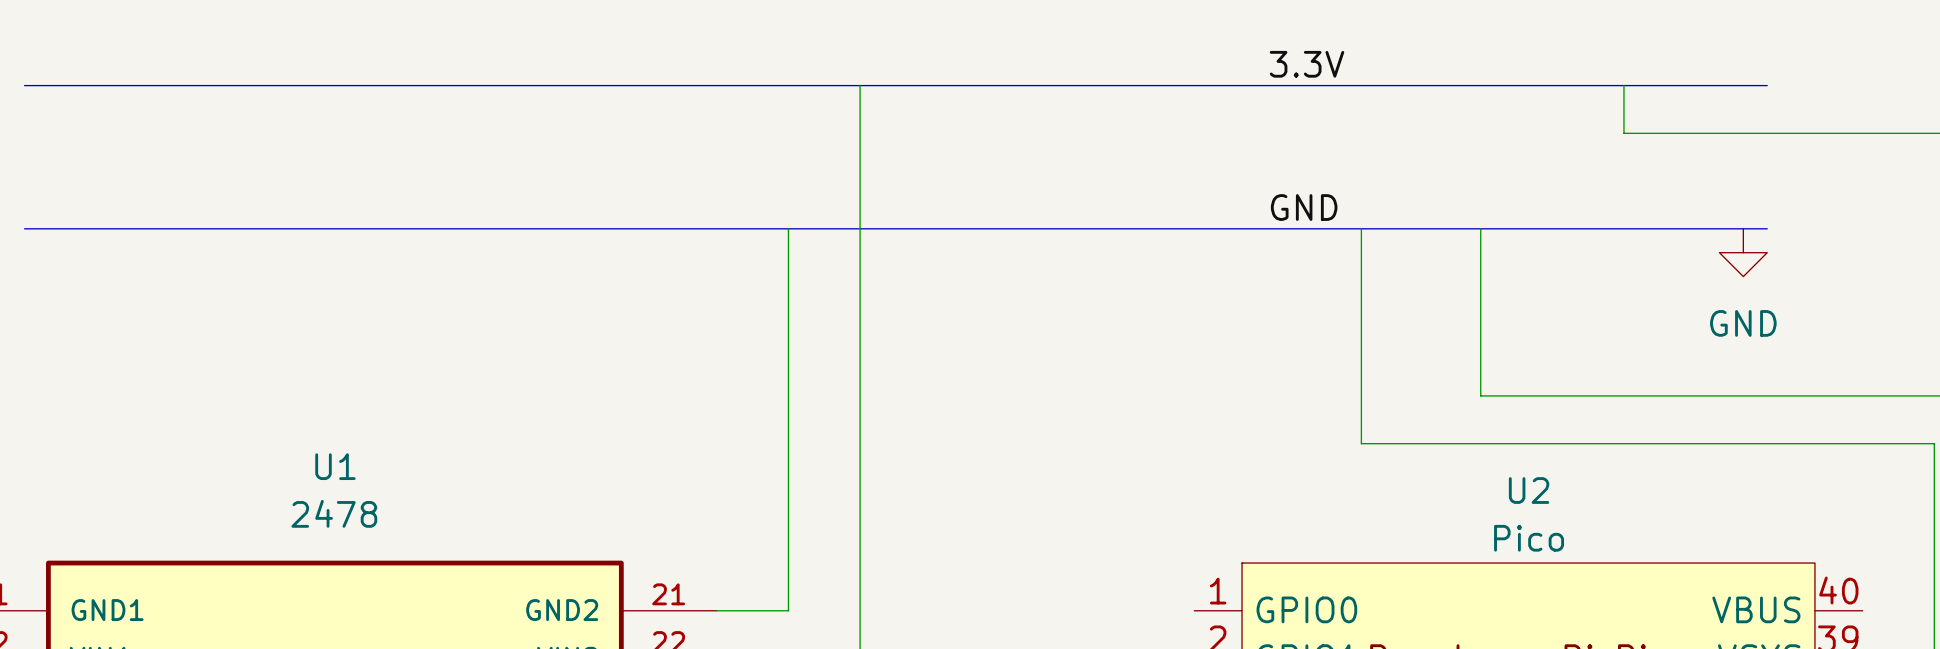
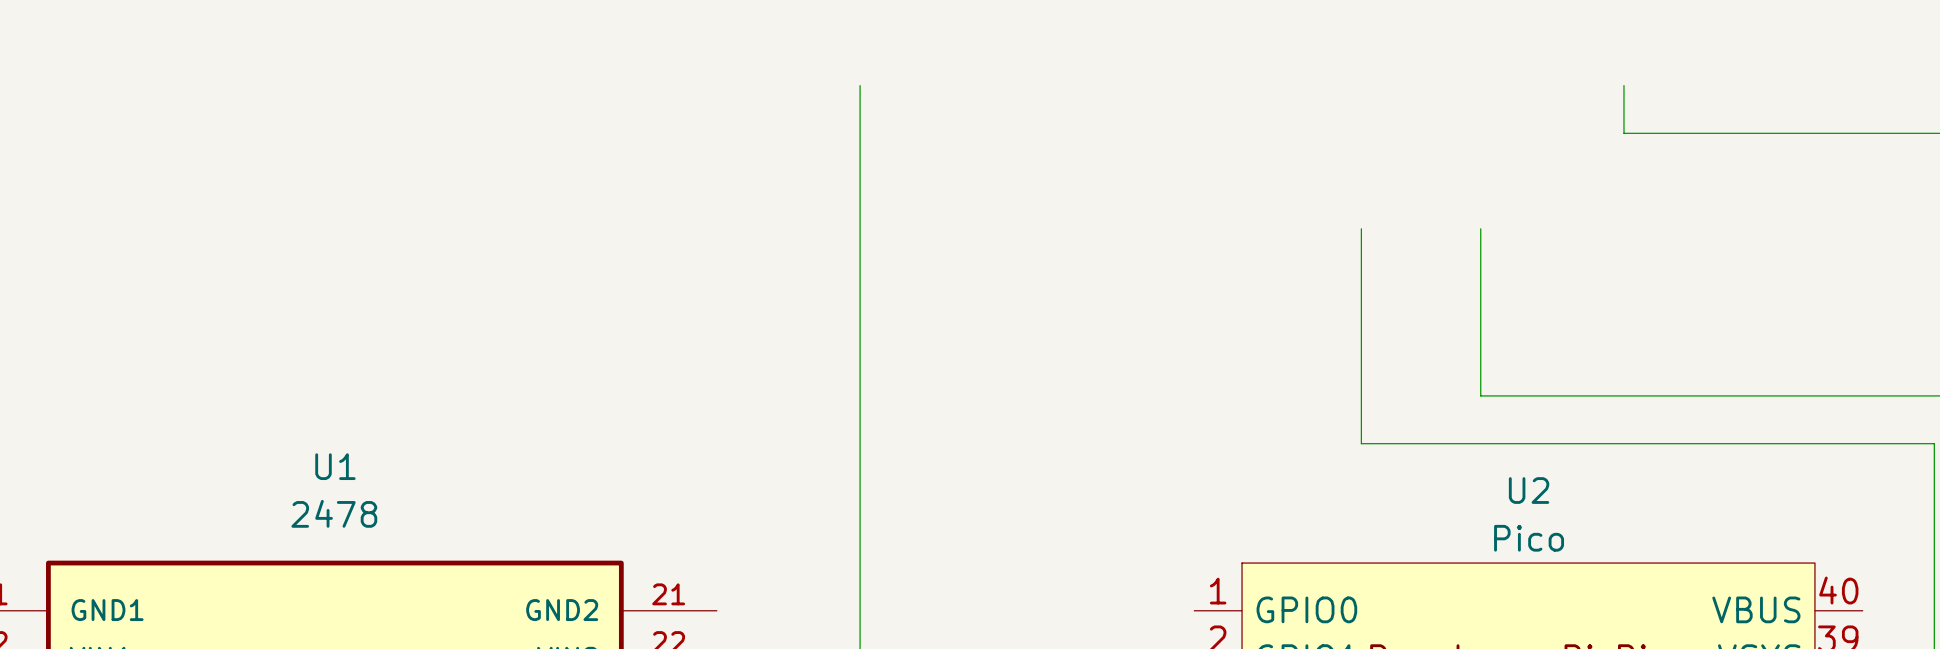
label: 3.3V (1307, 64) -> none
bus: (24, 85) (1767, 85) -> none
label: GND (1304, 207) -> none
bus: (24, 228) (1767, 228) -> none
wire: (788, 228) (788, 610) (716, 610) -> none
power symbol: GND (1743, 252) -> none

